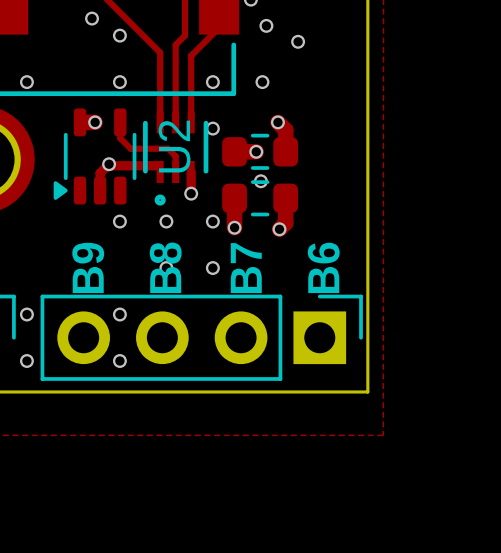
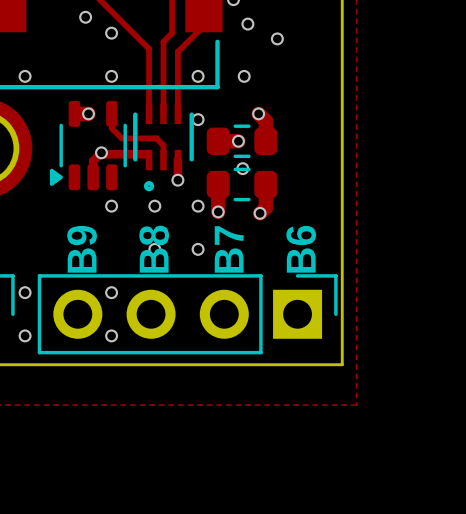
U2 name: U2 (174, 146) -> none

